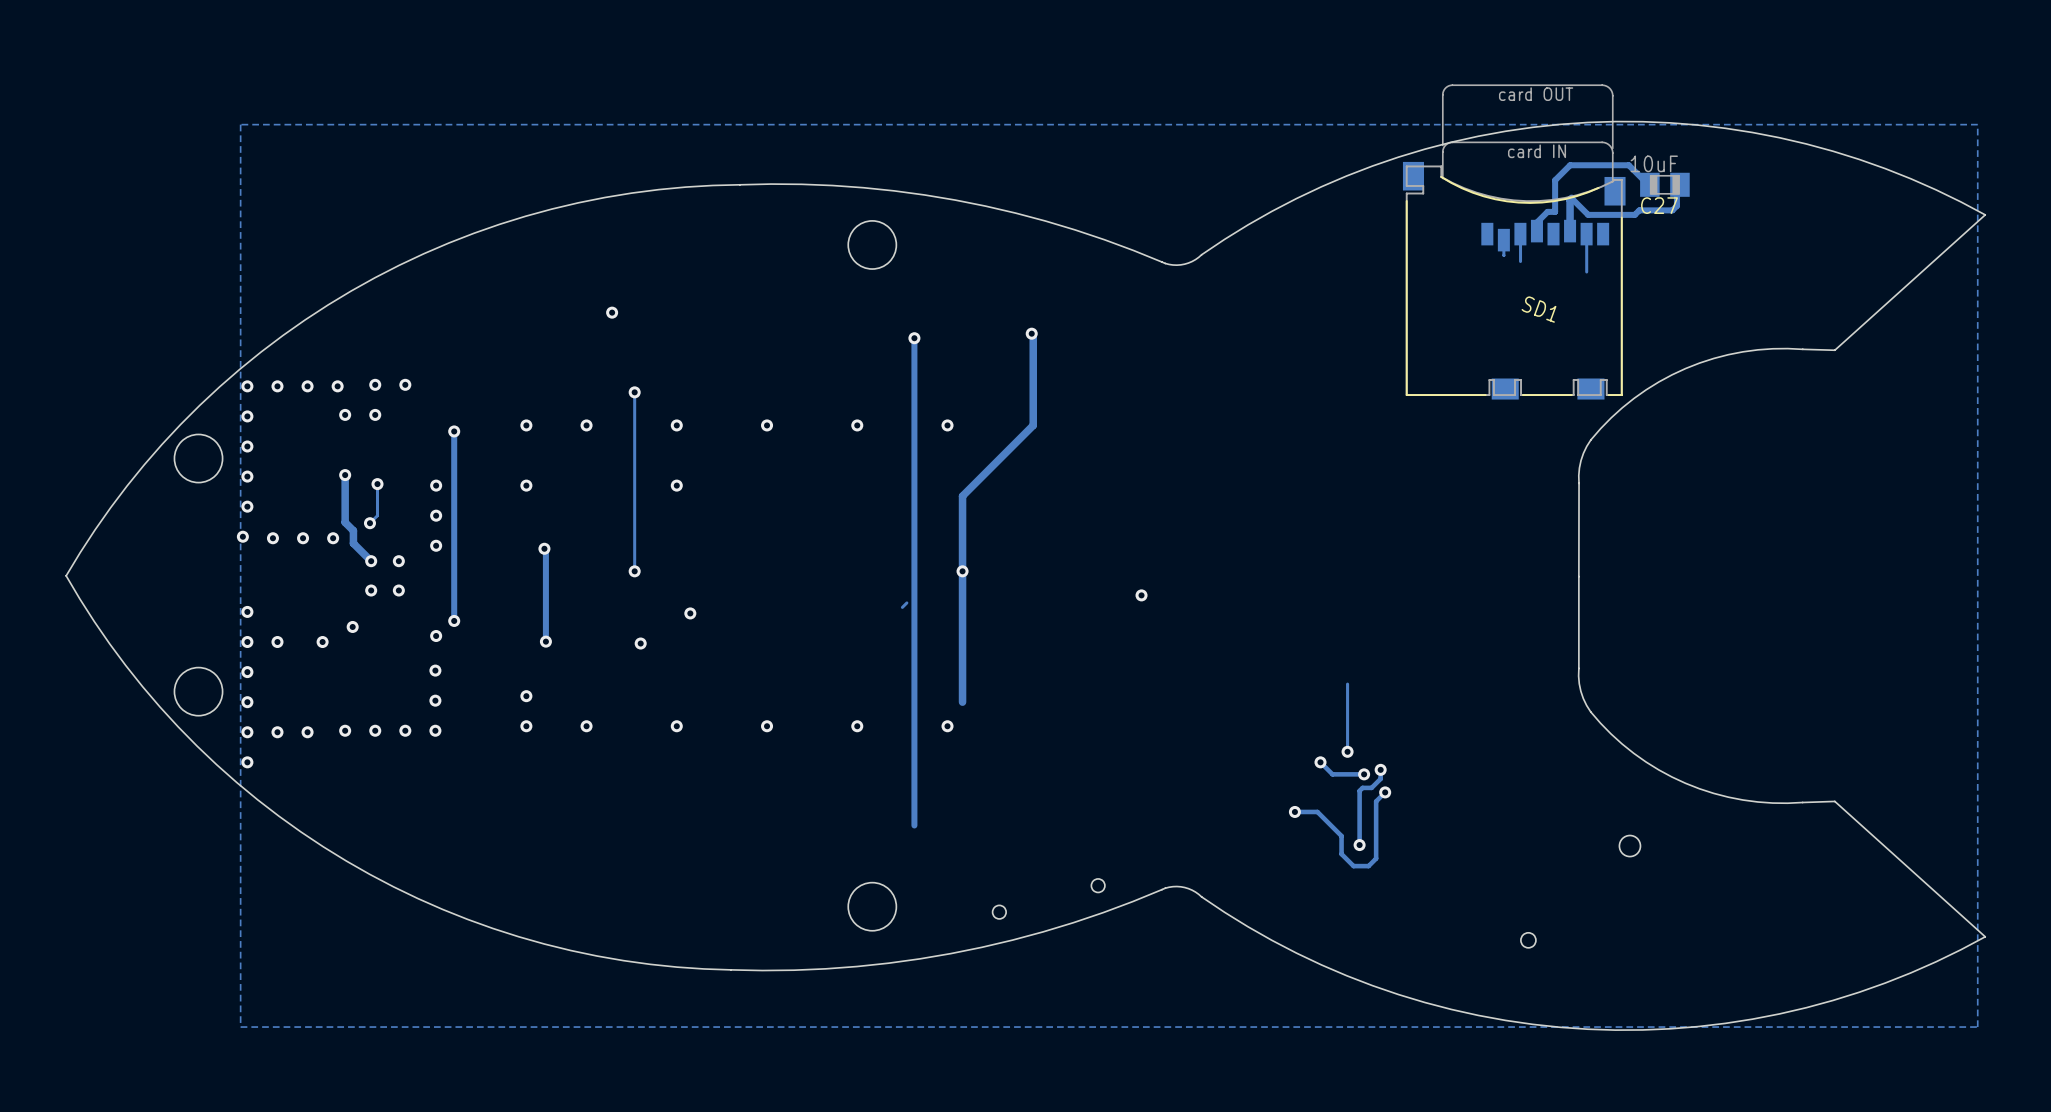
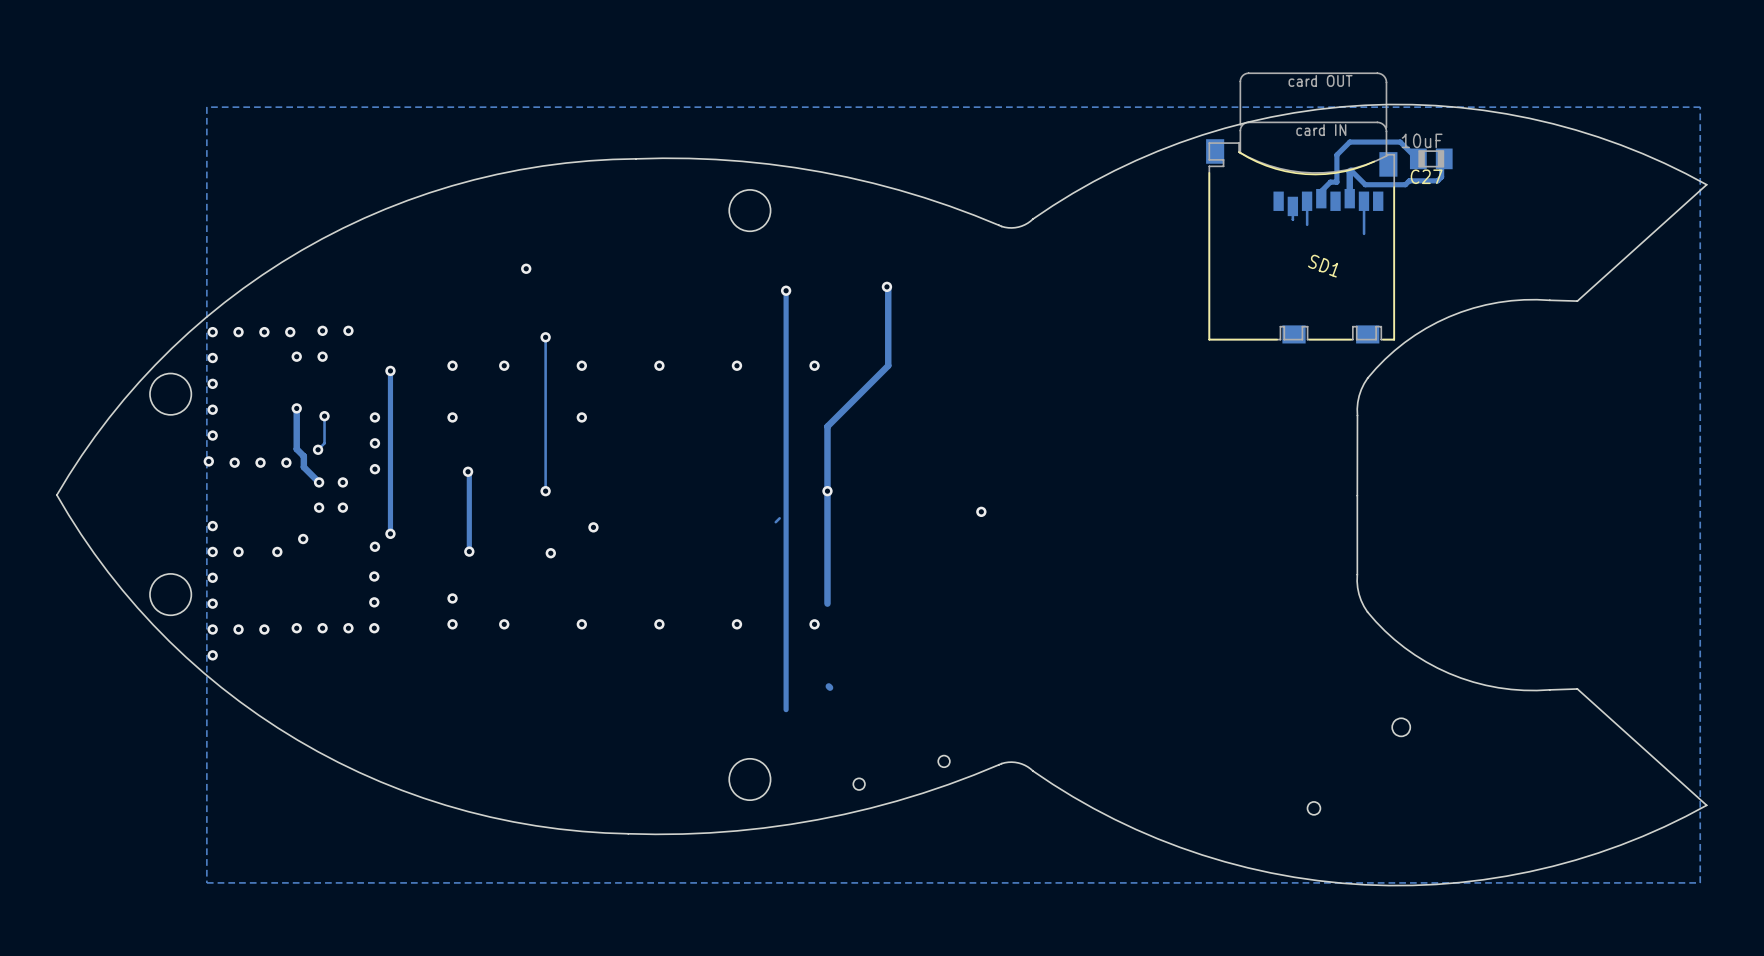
track: (1347, 684) (1347, 751) -> none
via: (1347, 751) -> none
track: (1320, 762) (1332, 774) (1364, 774) -> none
via: (1320, 762) -> none
track: (1380, 769) (1380, 778) (1371, 787) (1362, 787) (1359, 790) (1359, 845) -> none
via: (1380, 769) -> none
via: (1364, 774) -> none
track: (1385, 792) (1376, 801) (1376, 858) (1368, 866) (1353, 866) (1341, 854) (1341, 836) (1317, 811) (1294, 811) -> none
via: (1385, 792) -> none
track: none -> (828, 686) (830, 687)
via: (1294, 811) -> none
via: (1359, 845) -> none

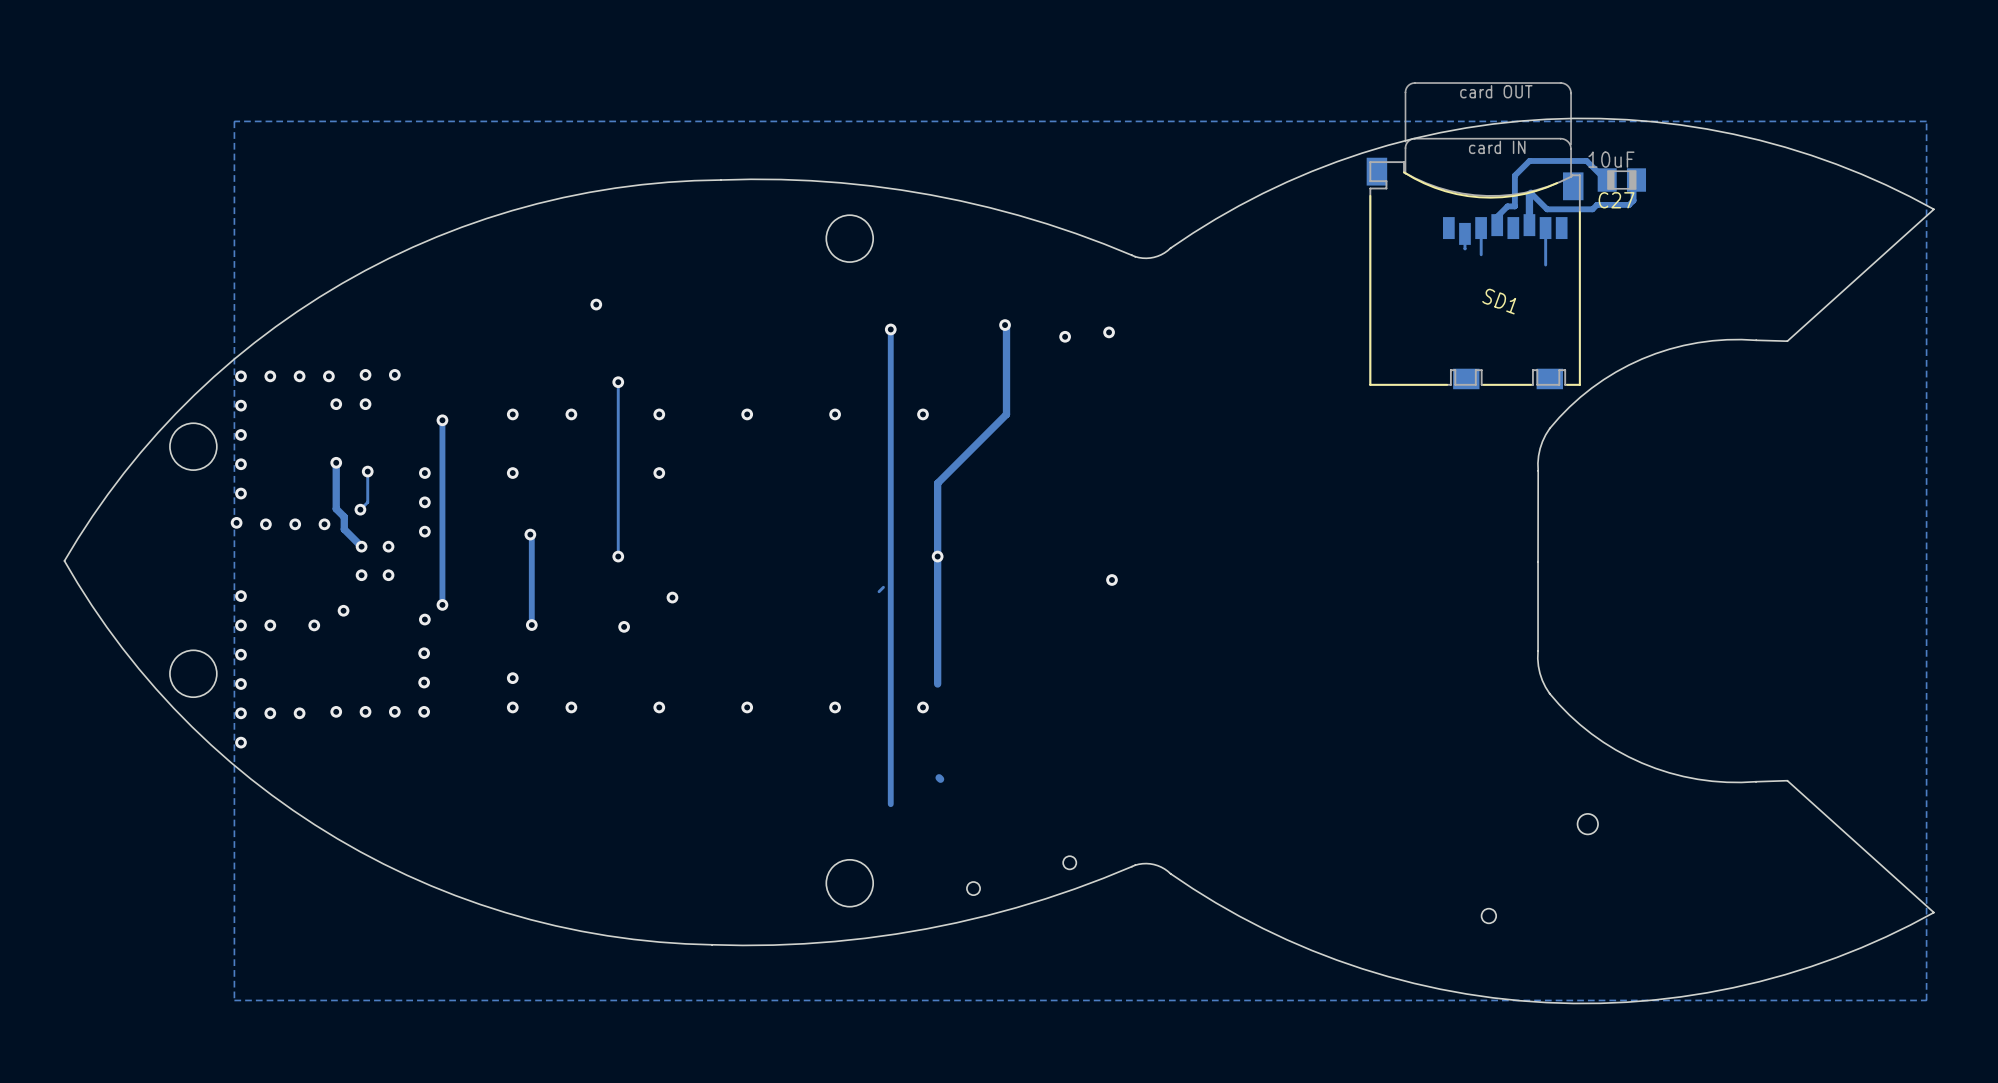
via: none -> (1109, 332)
via: none -> (1065, 336)

